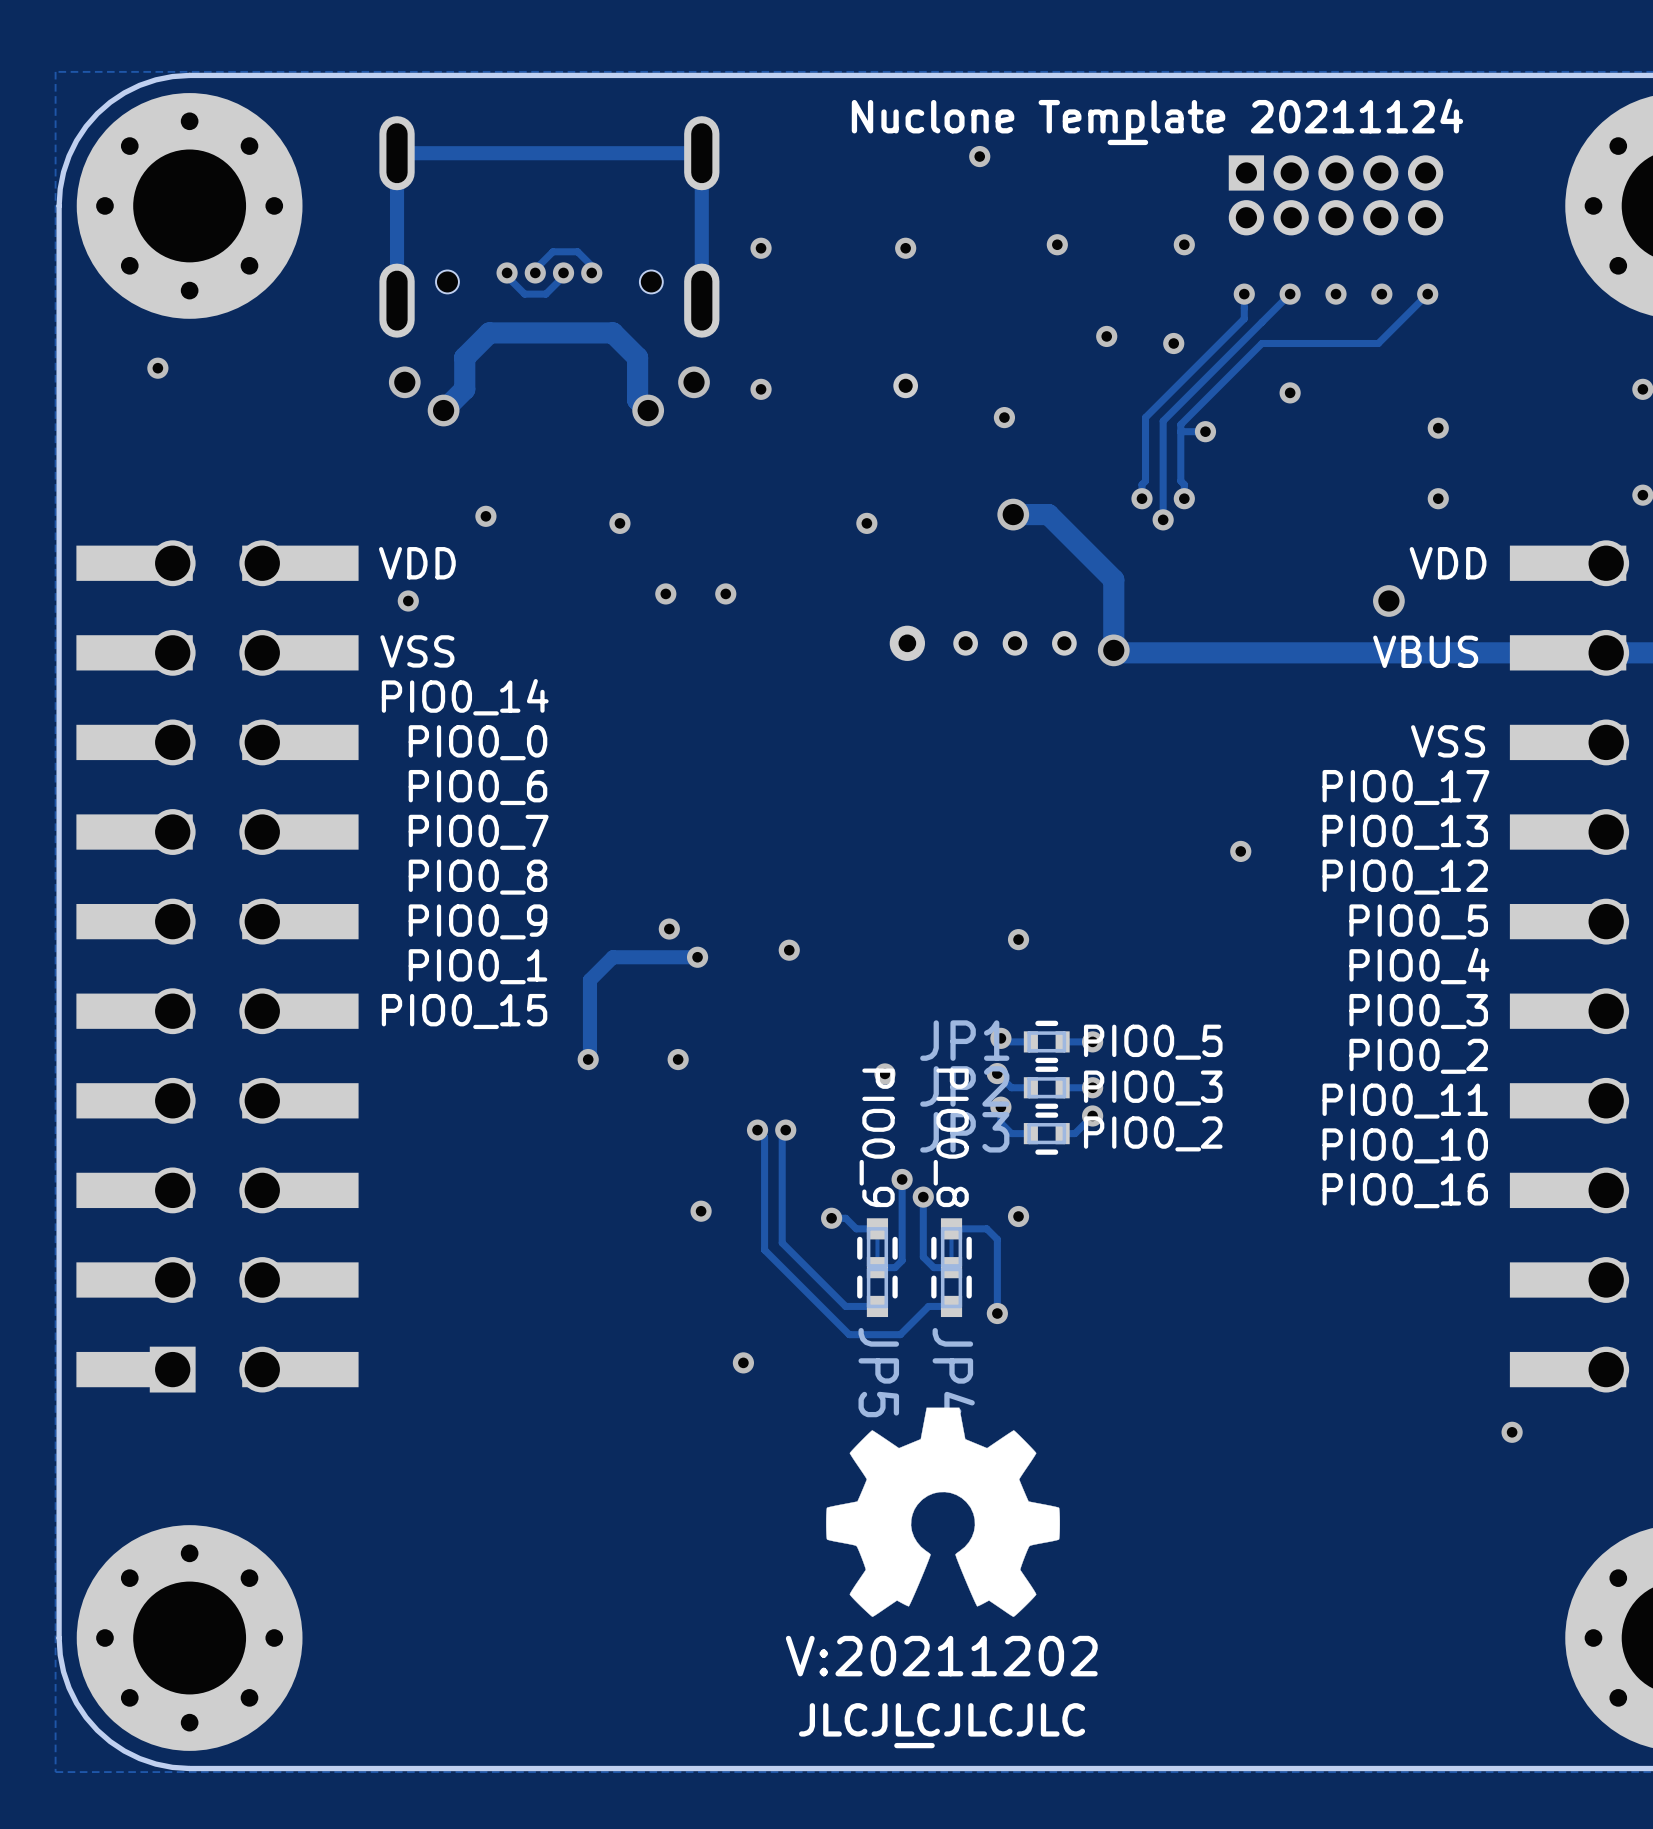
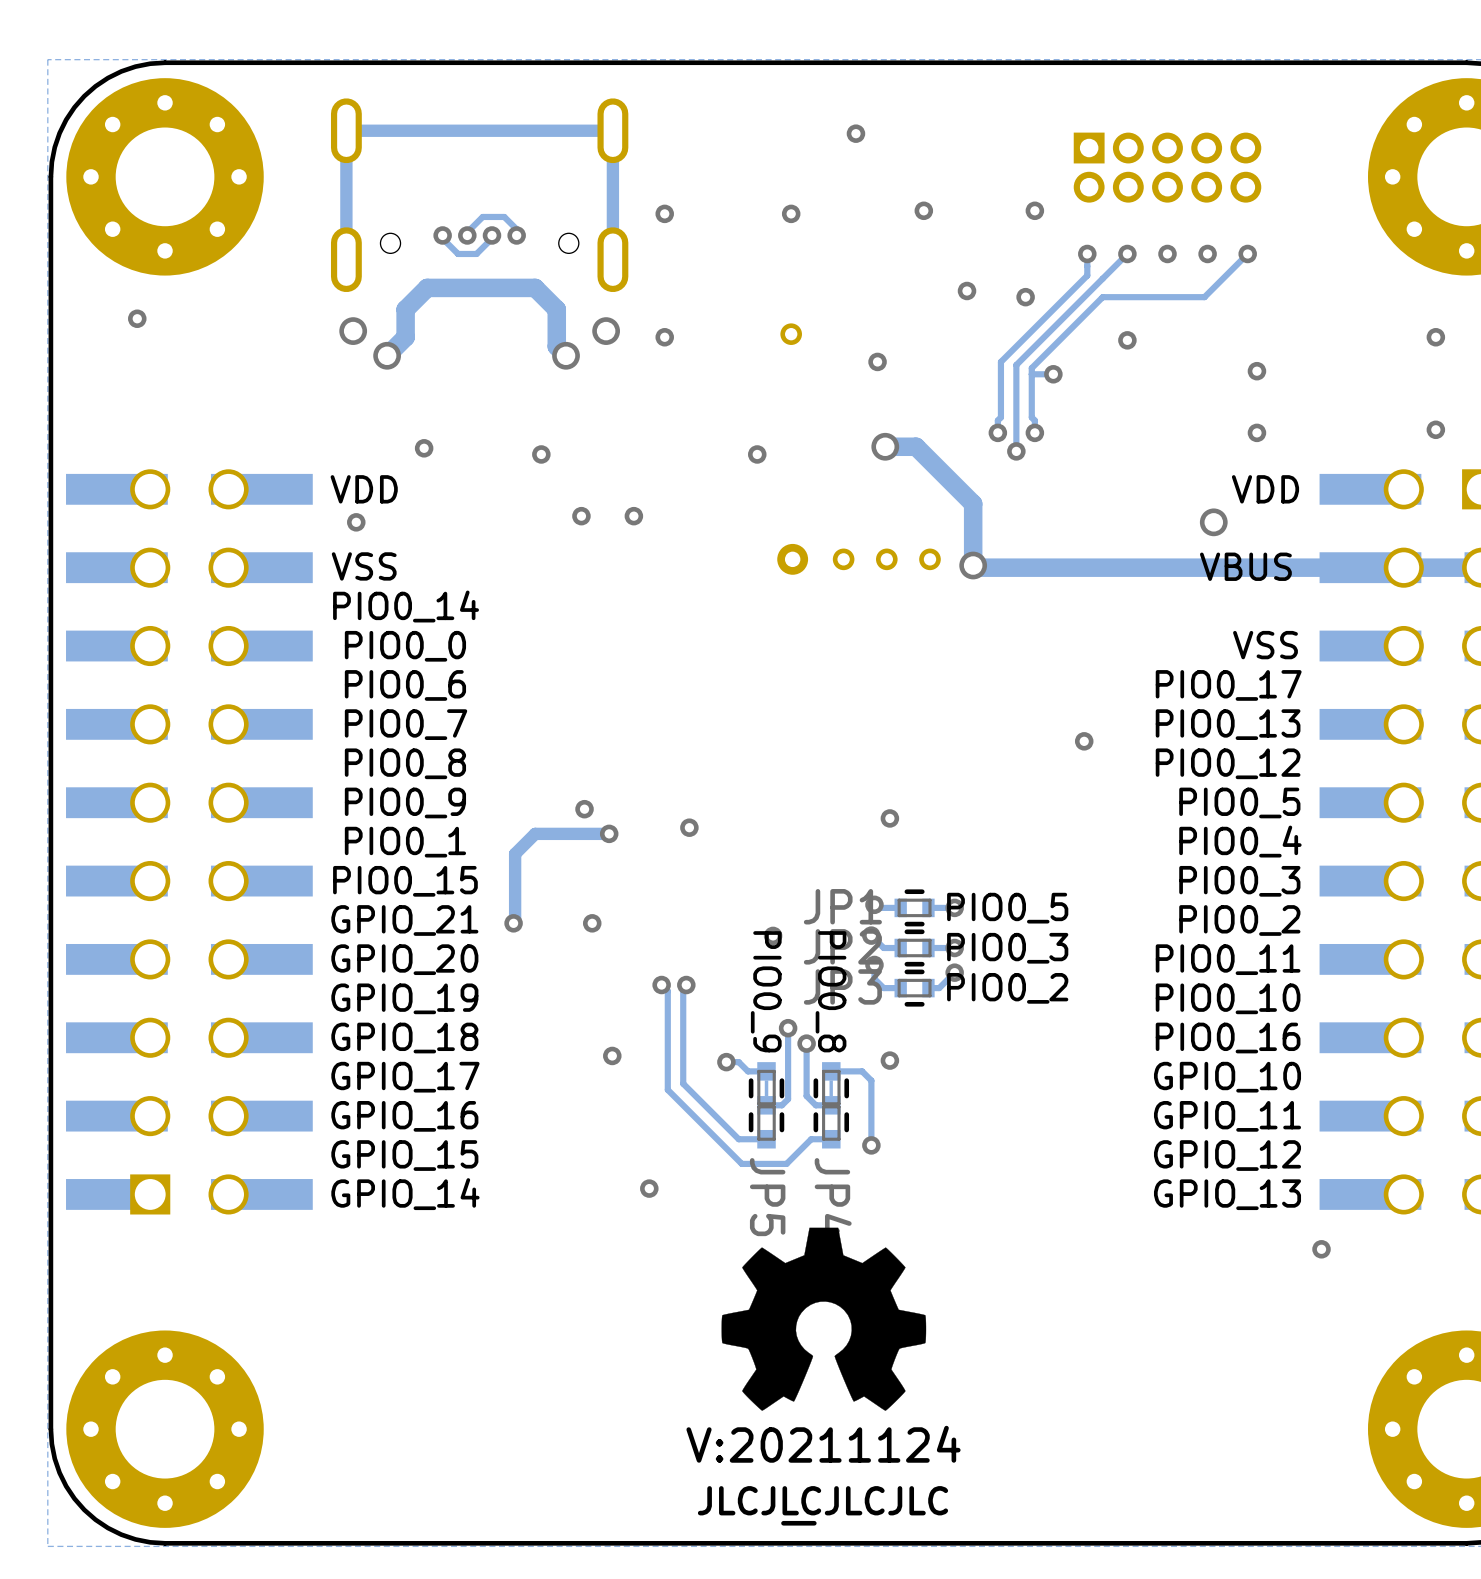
drawing: [1107, 139, 1149, 146] -> none
part footprint: [76, 540, 359, 1393] -> [66, 469, 313, 1215]
part text: none -> GPIO_10 (1227, 1077)
part text: none -> GPIO_11 (1227, 1116)
part text: none -> GPIO_12 (1227, 1155)
part text: none -> GPIO_13 (1227, 1194)
drawing shape: [785, 1635, 1098, 1677] -> [686, 1425, 961, 1463]

